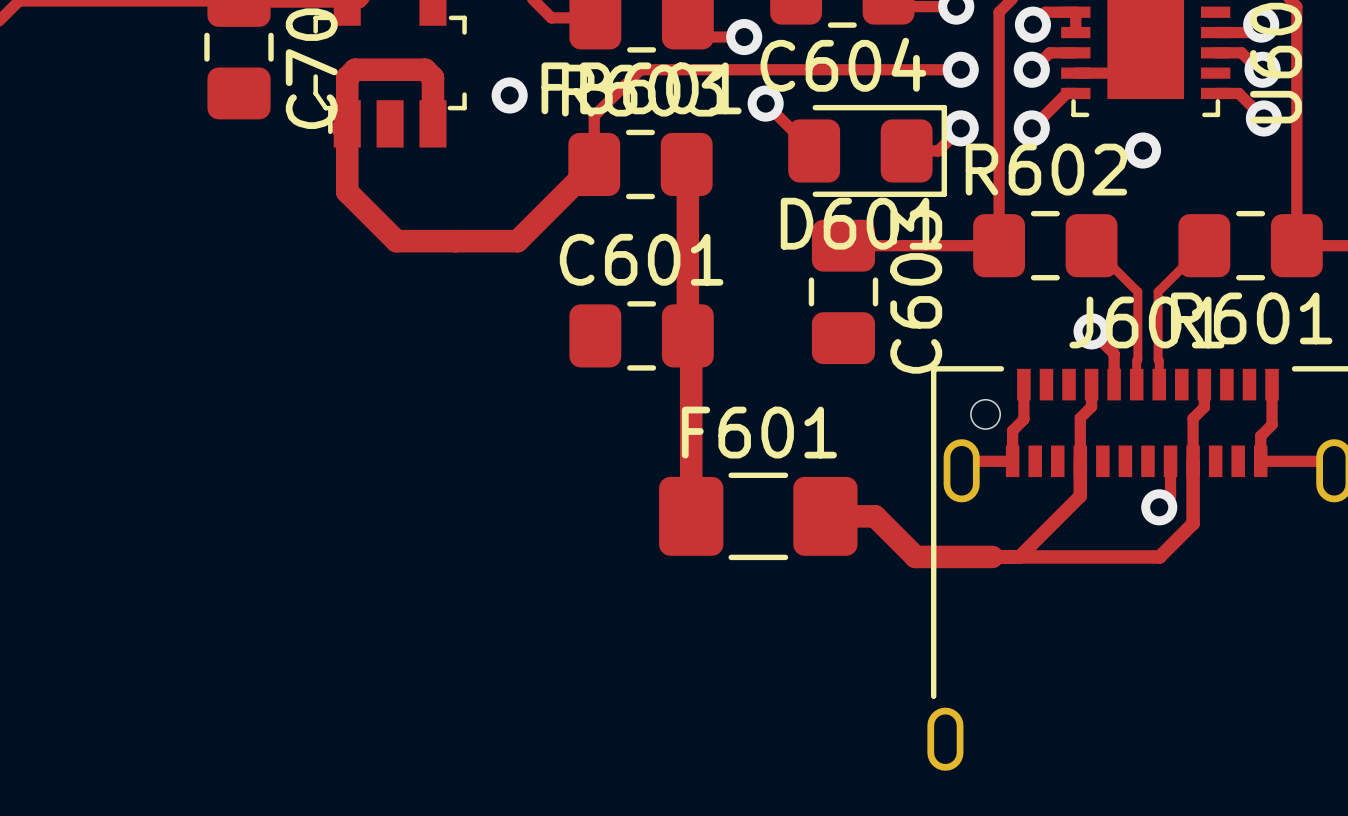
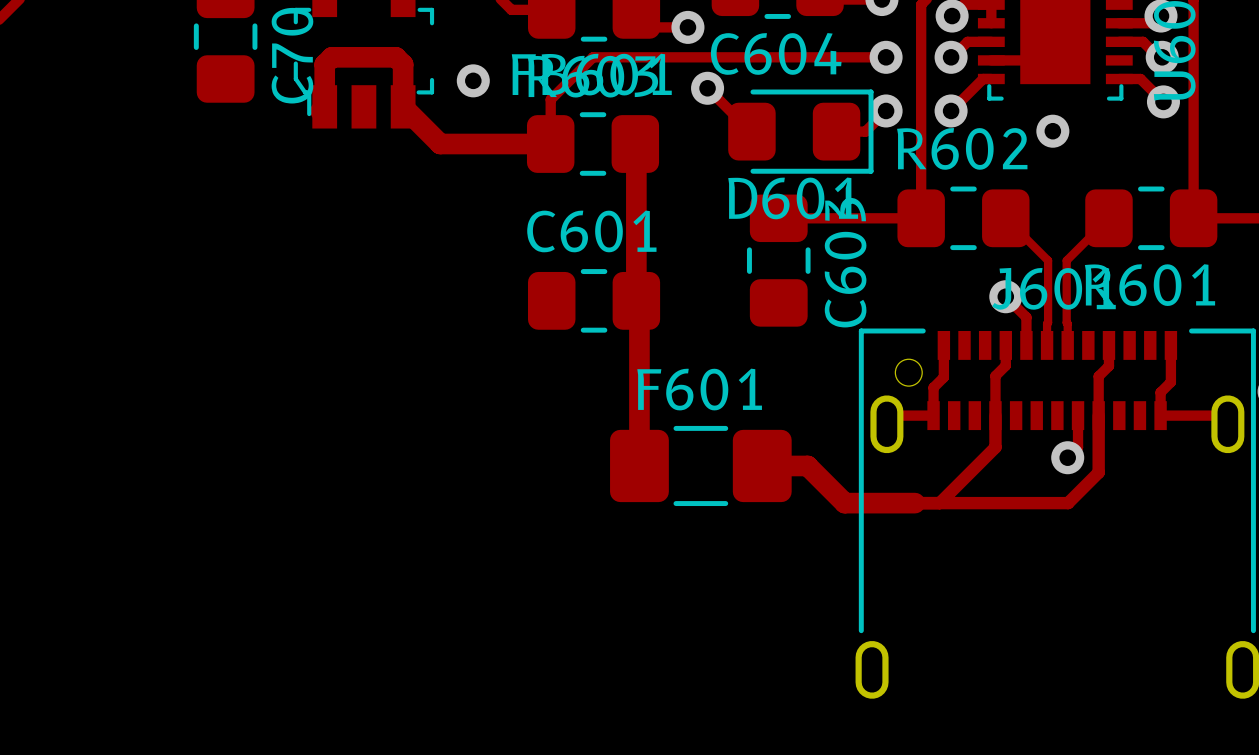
track: (347, 123) (347, 191) (396, 241) (517, 241) (594, 164) -> (403, 106) (440, 144) (550, 144)

